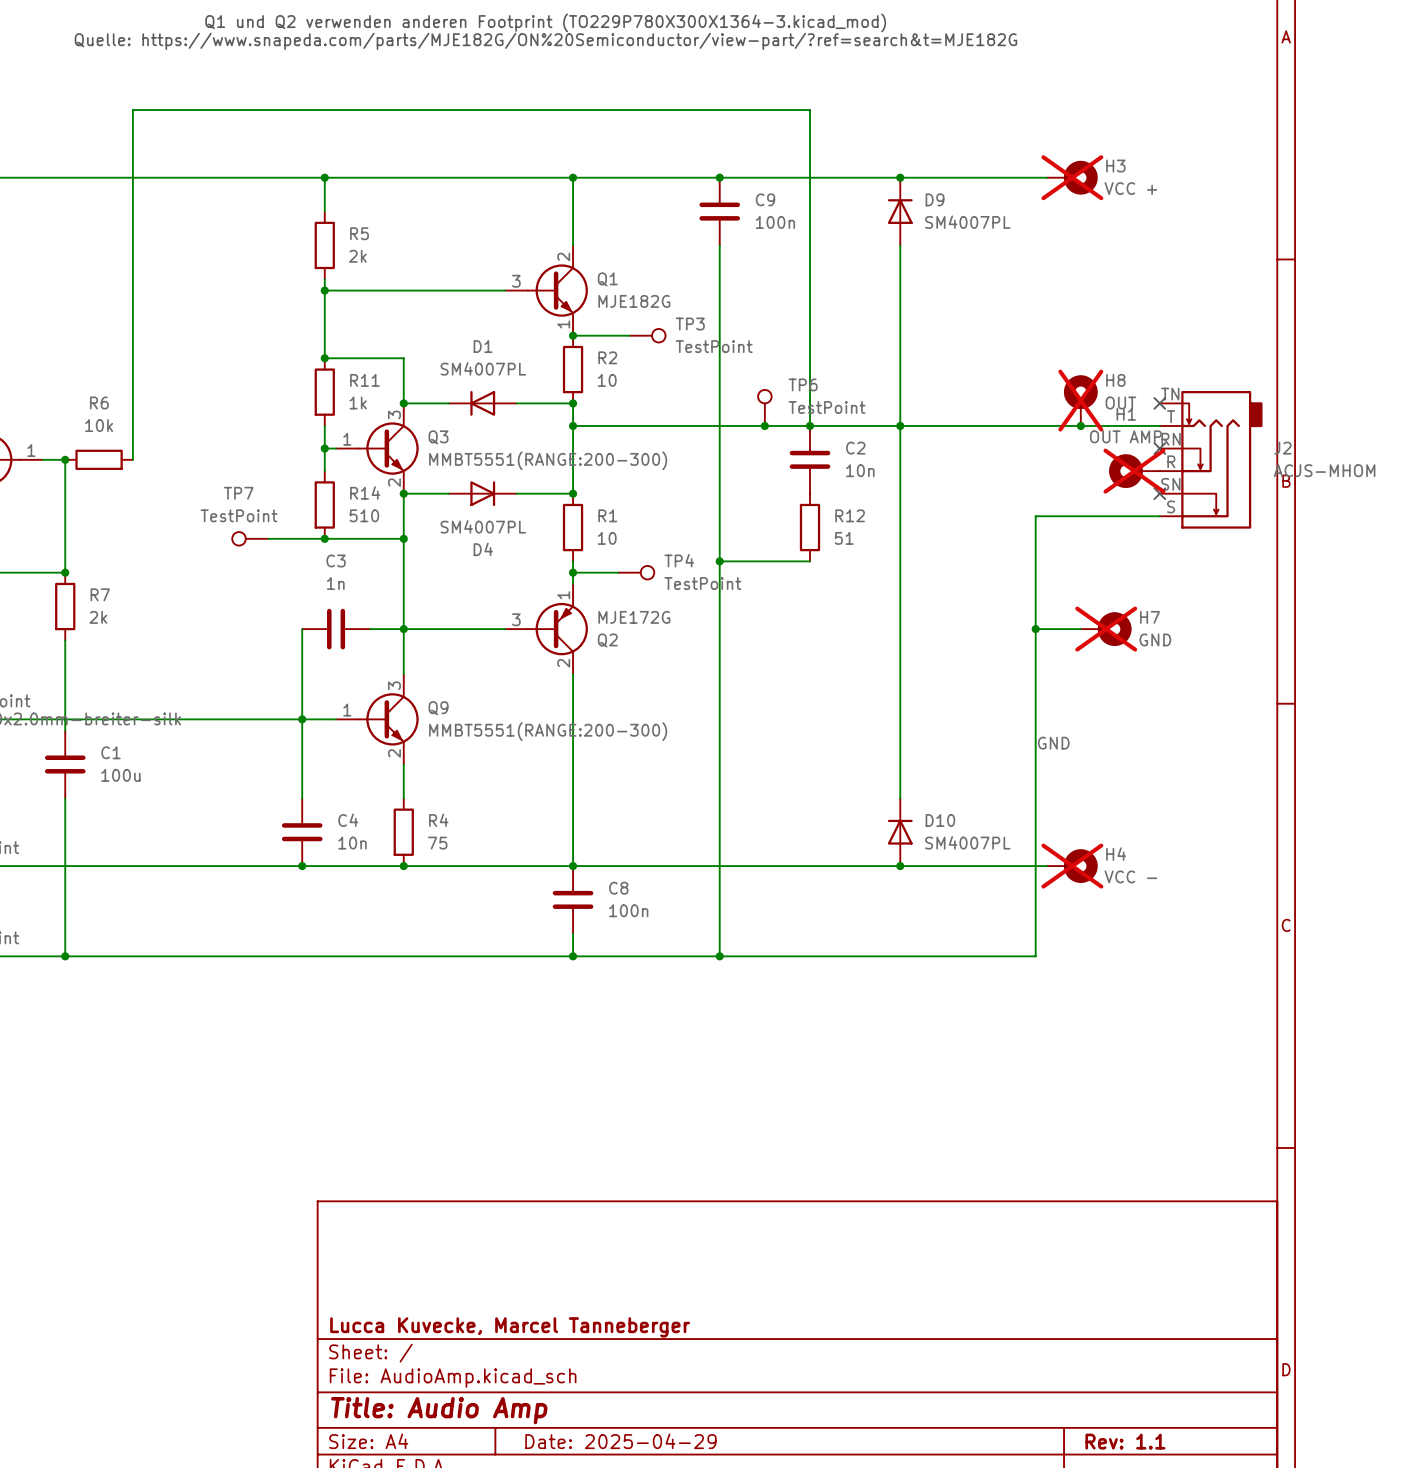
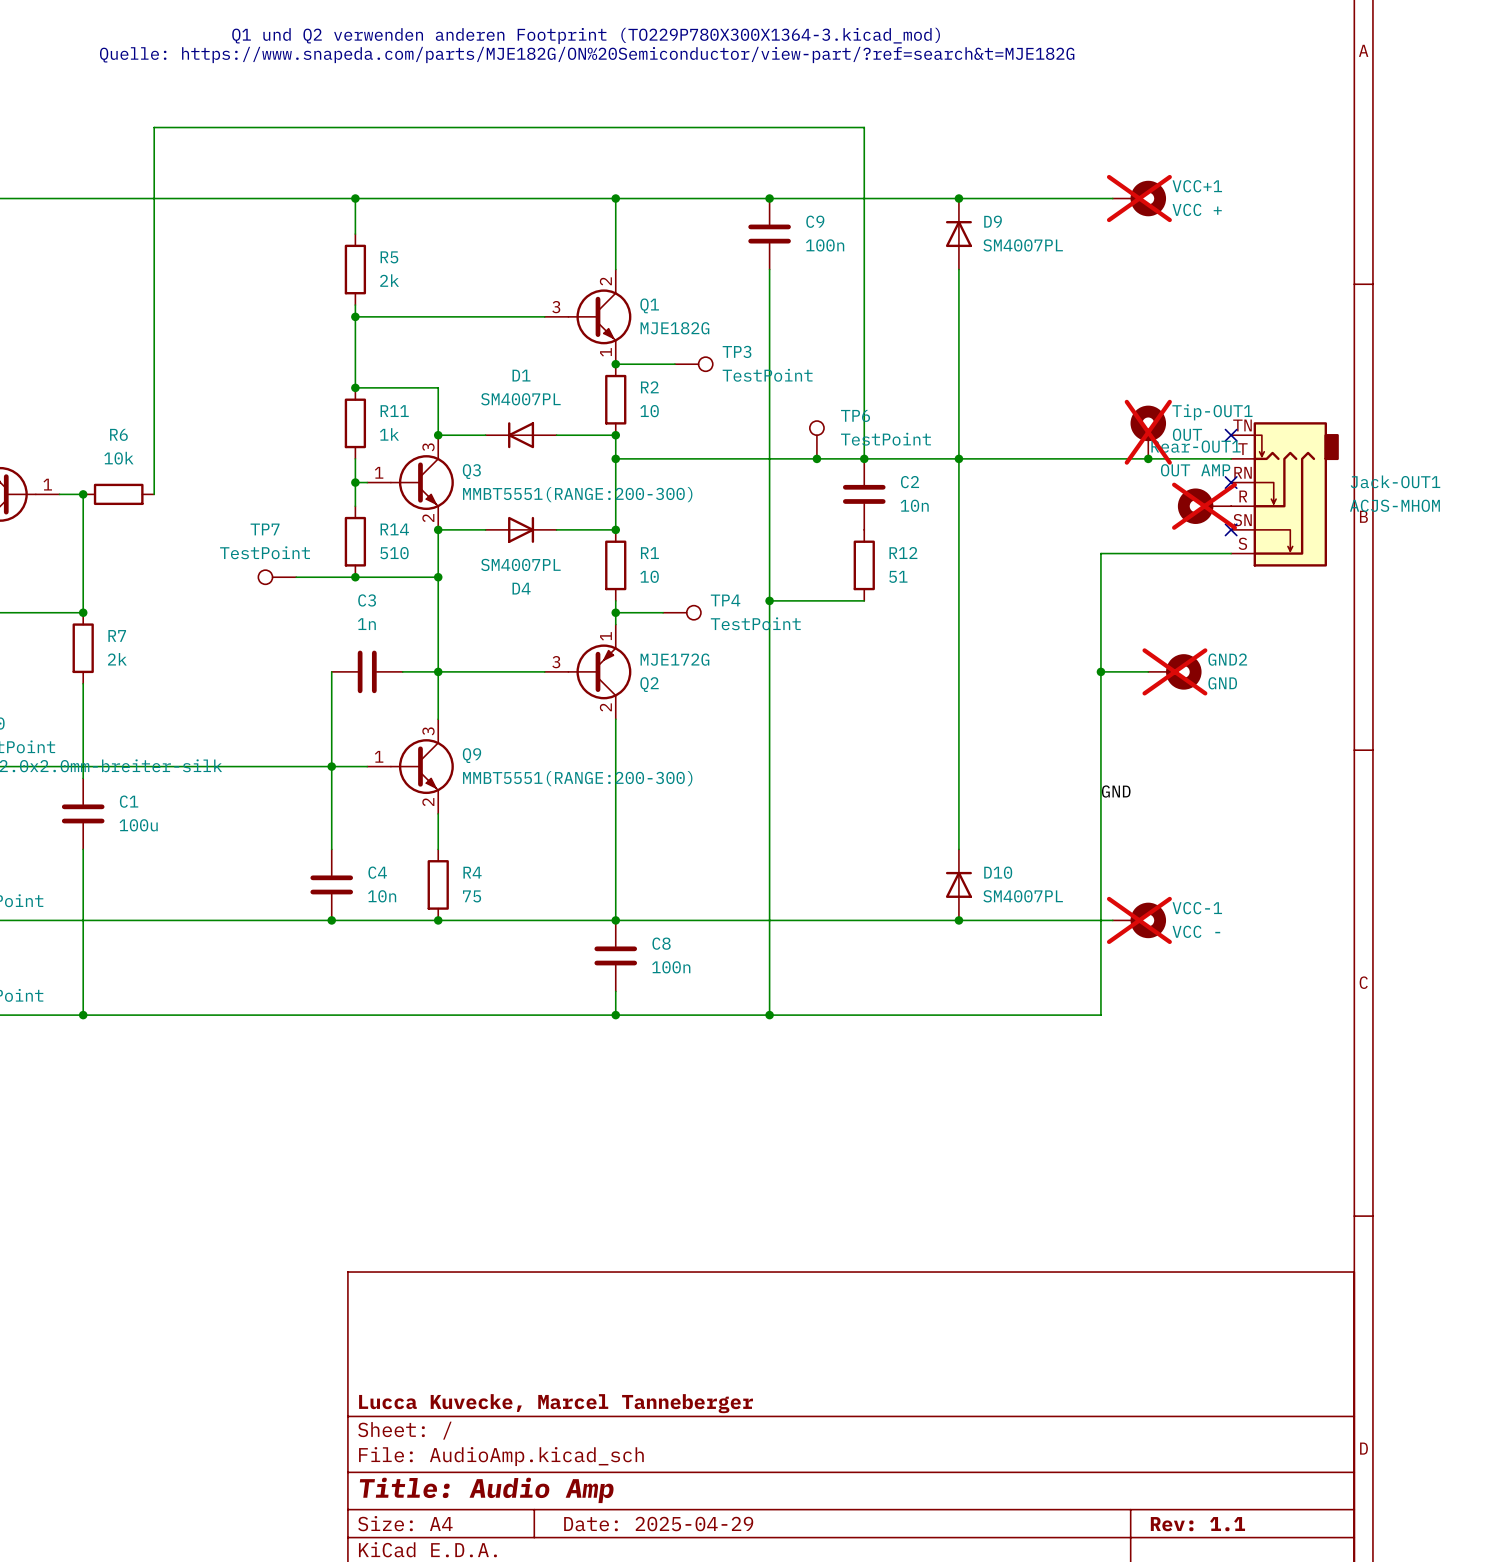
H3 name: H3 (1115, 166) -> VCC+1 (1197, 186)
H8 name: H8 (1115, 380) -> Tip-OUT1 (1212, 412)
H1 name: H1 (1126, 414) -> Rear-OUT1 (1195, 446)
J2 name: J2 (1282, 448) -> Jack-OUT1 (1395, 481)
H7 name: H7 (1149, 617) -> GND2 (1227, 659)
H4 name: H4 (1116, 854) -> VCC-1 (1197, 908)

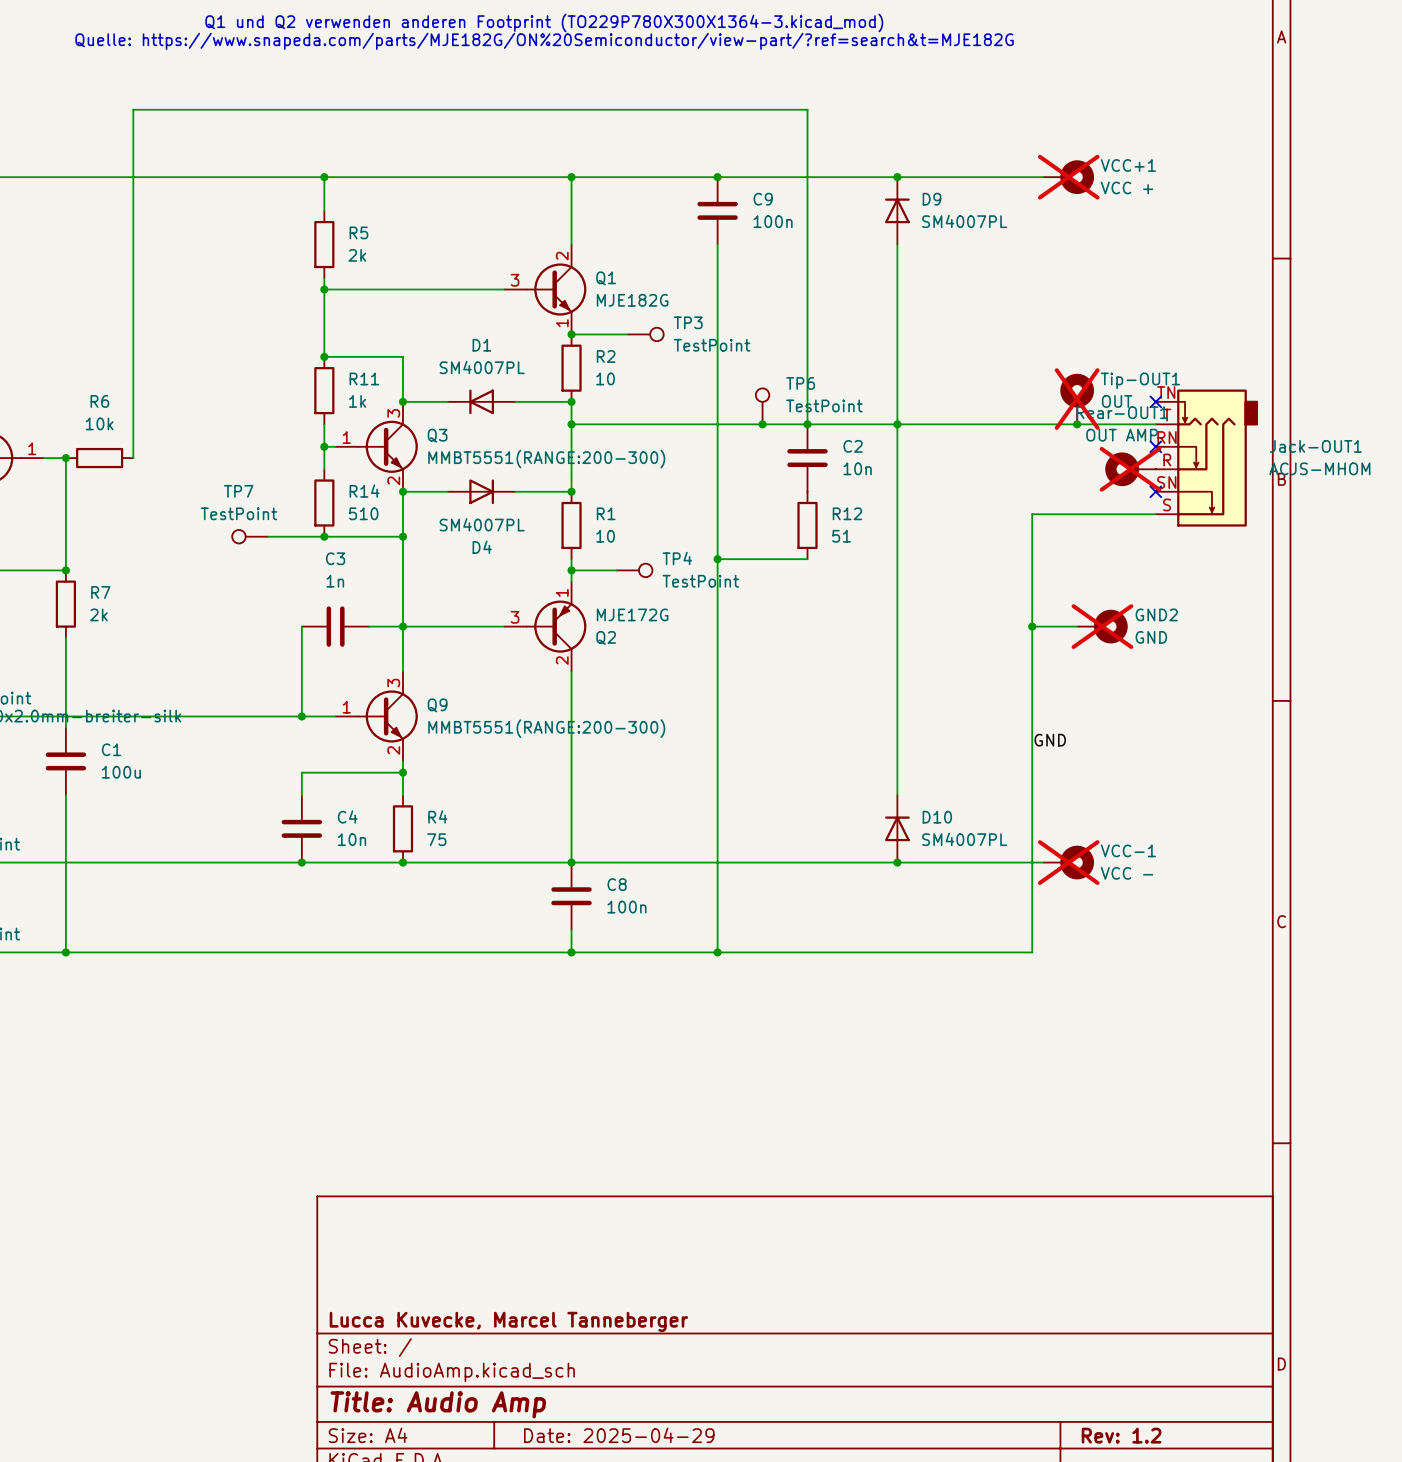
wire: (331, 766) (331, 825) -> (402, 772) (301, 772)
junction: none -> (402, 772)
title block: Rev: 1.1 (1197, 1524) -> Rev: 1.2 (1121, 1435)

